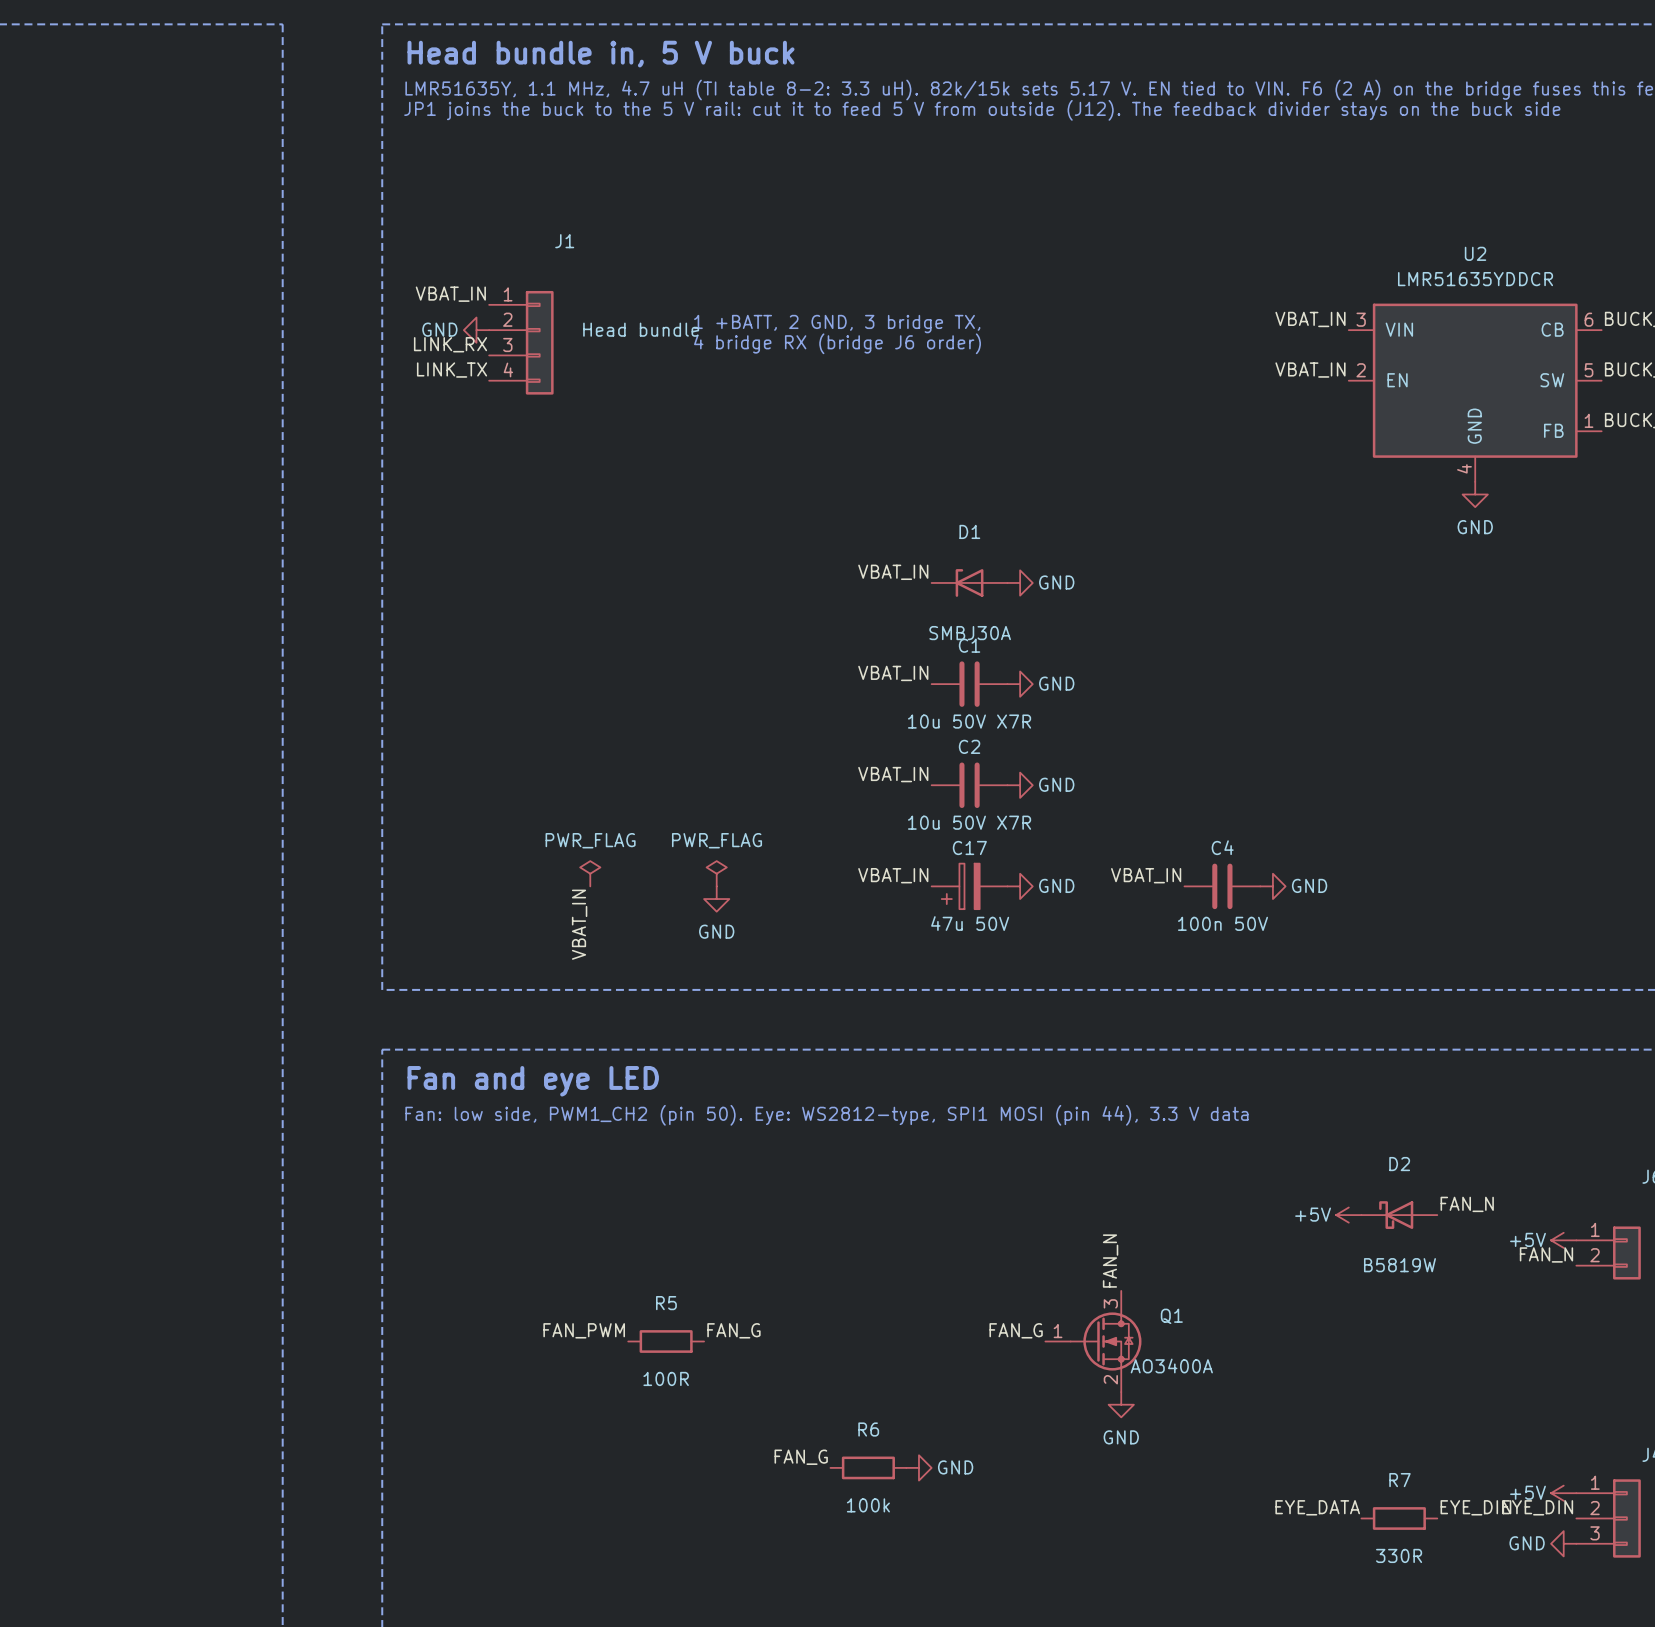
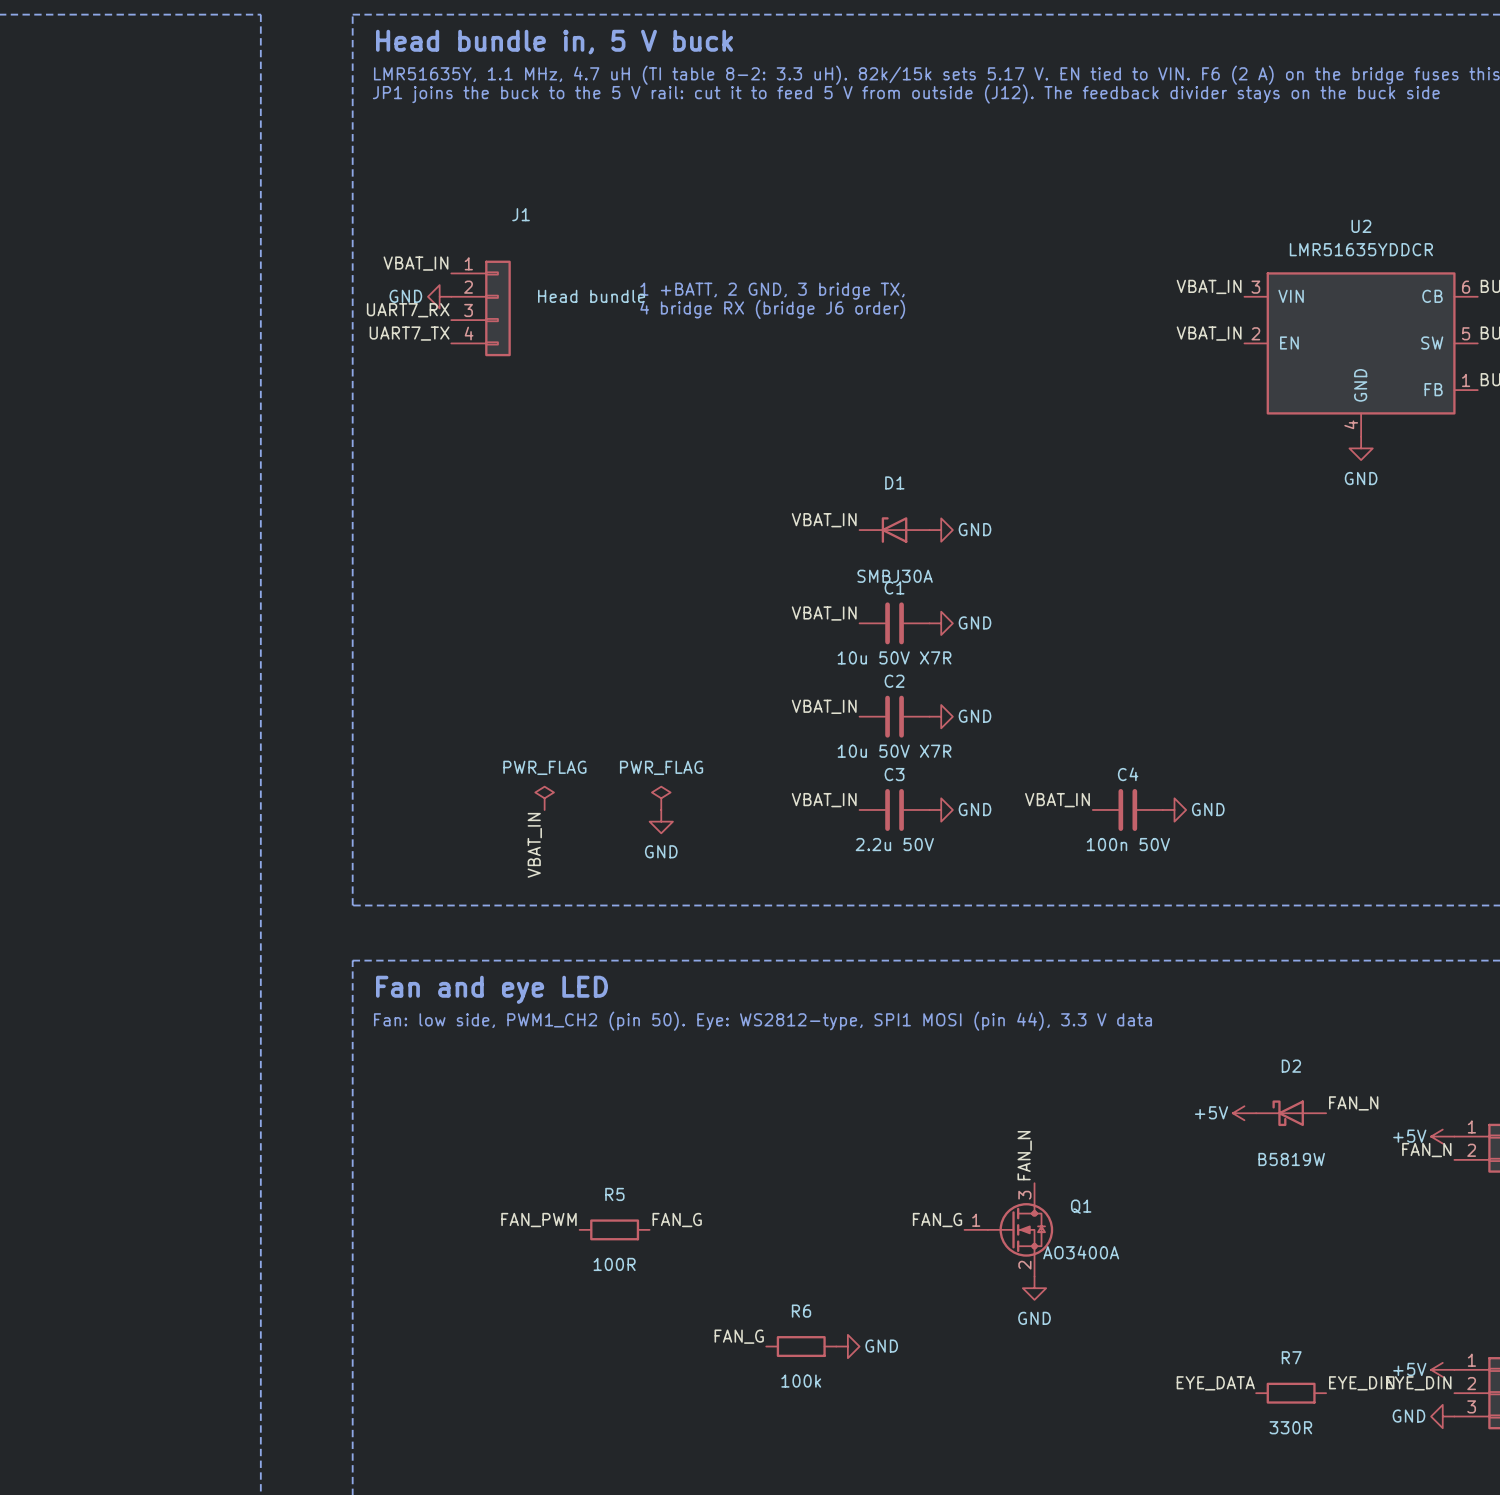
label: LINK_RX (450, 344) -> UART7_RX (408, 310)
label: LINK_TX (452, 370) -> UART7_TX (409, 333)
C17: 47u 50V (969, 886) -> none
C3: none -> 2.2u 50V (894, 809)

